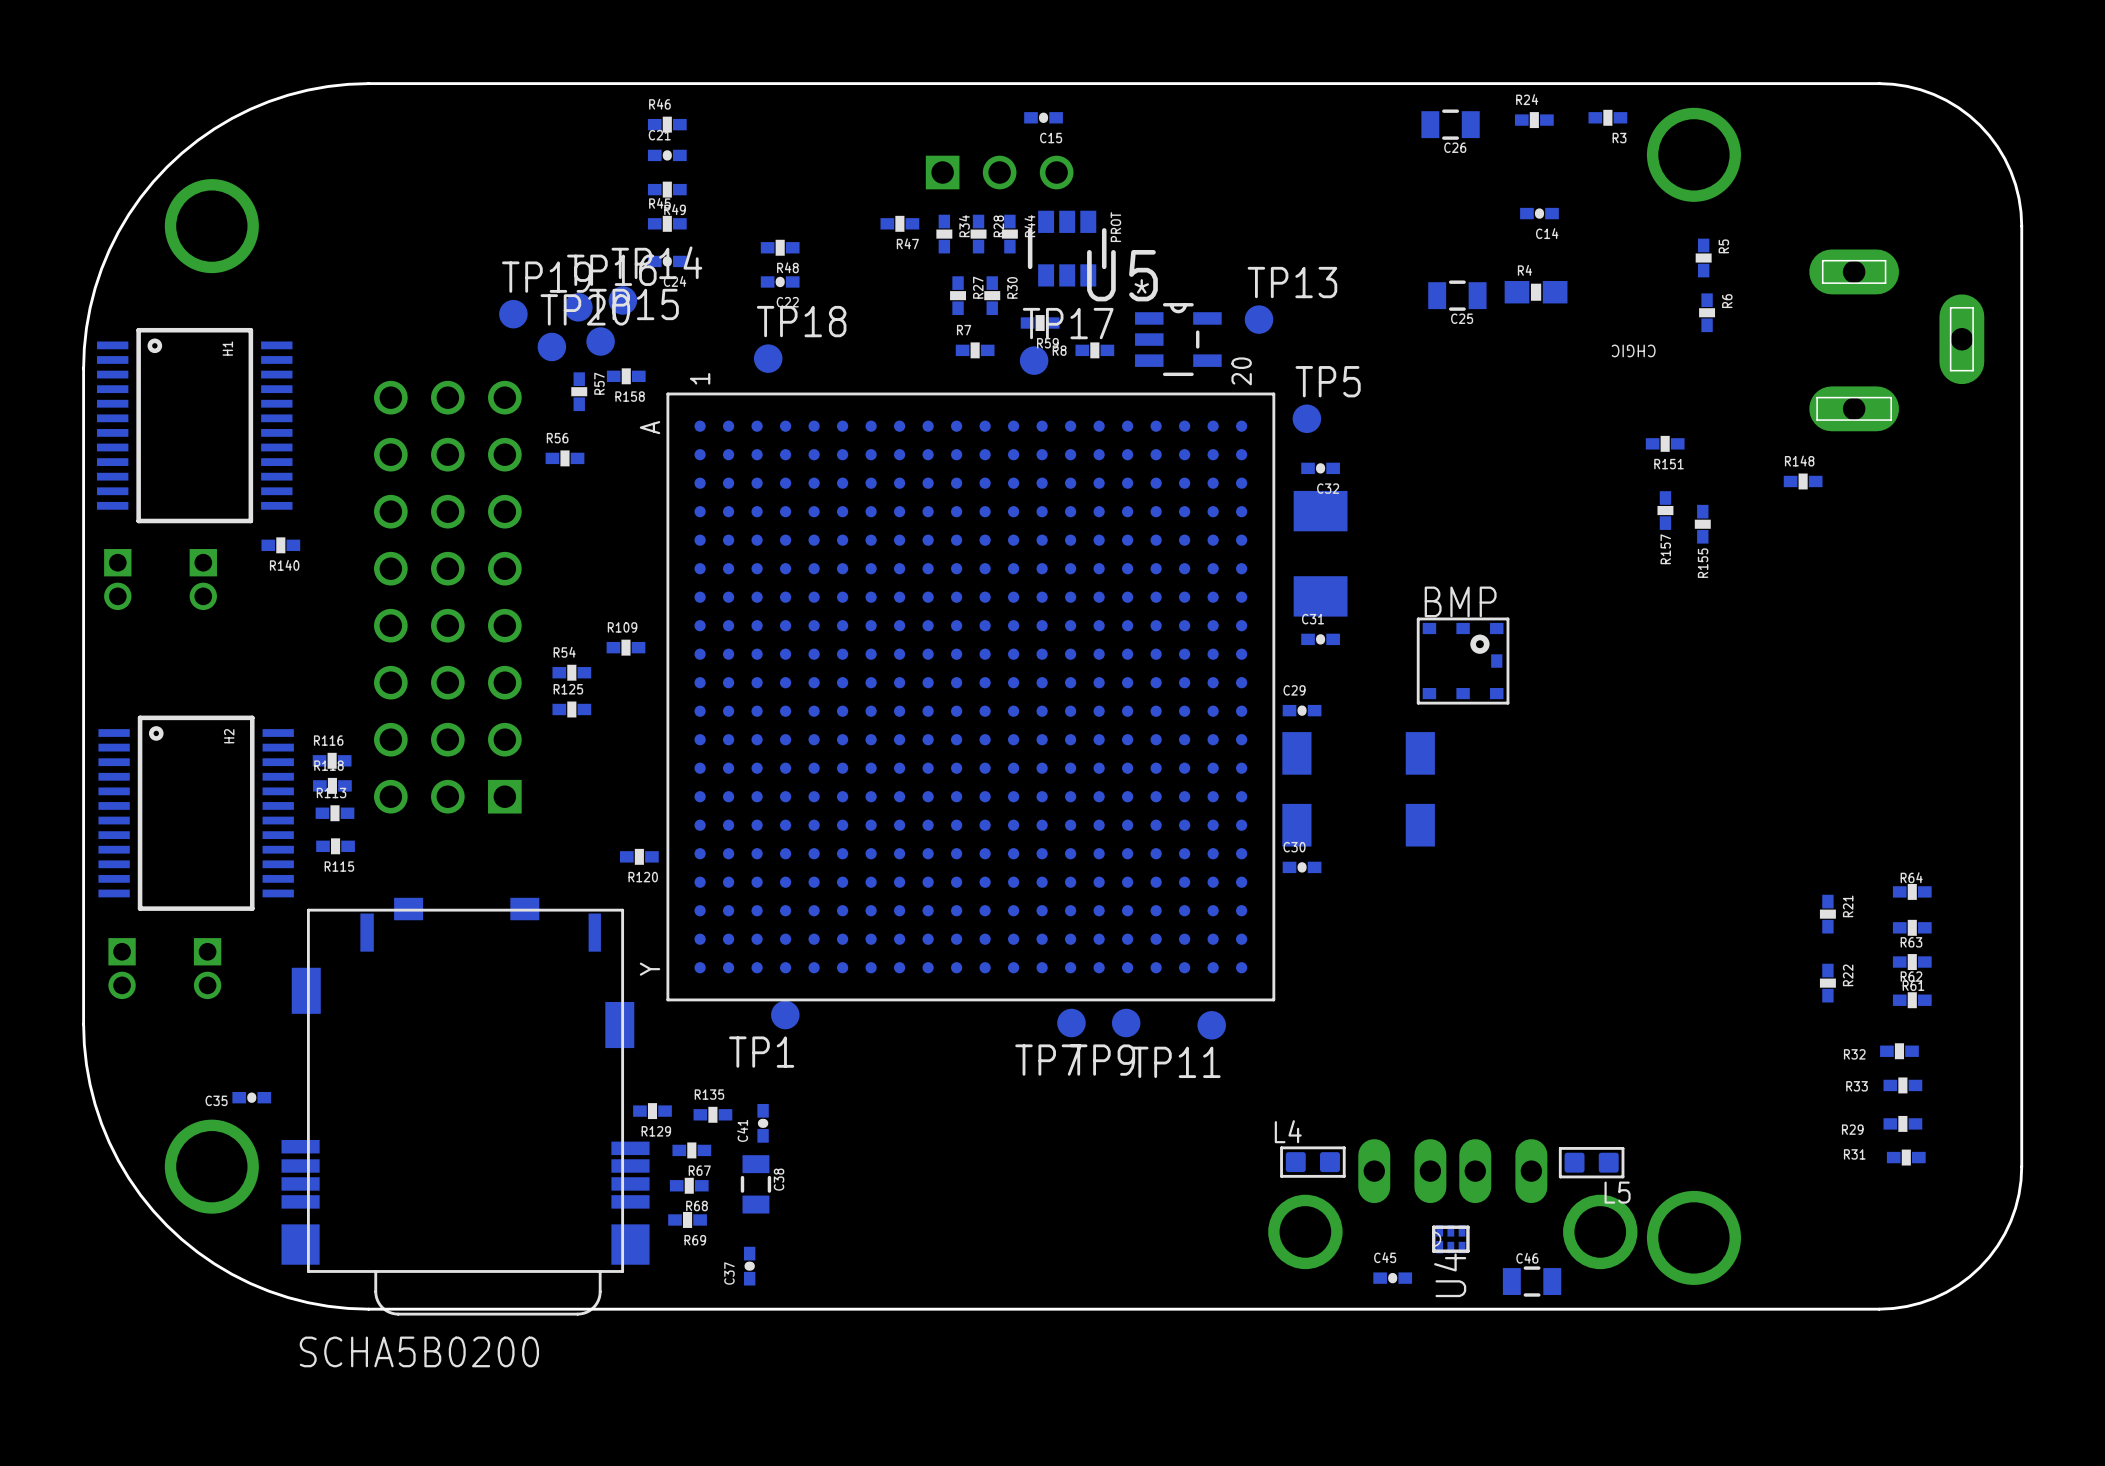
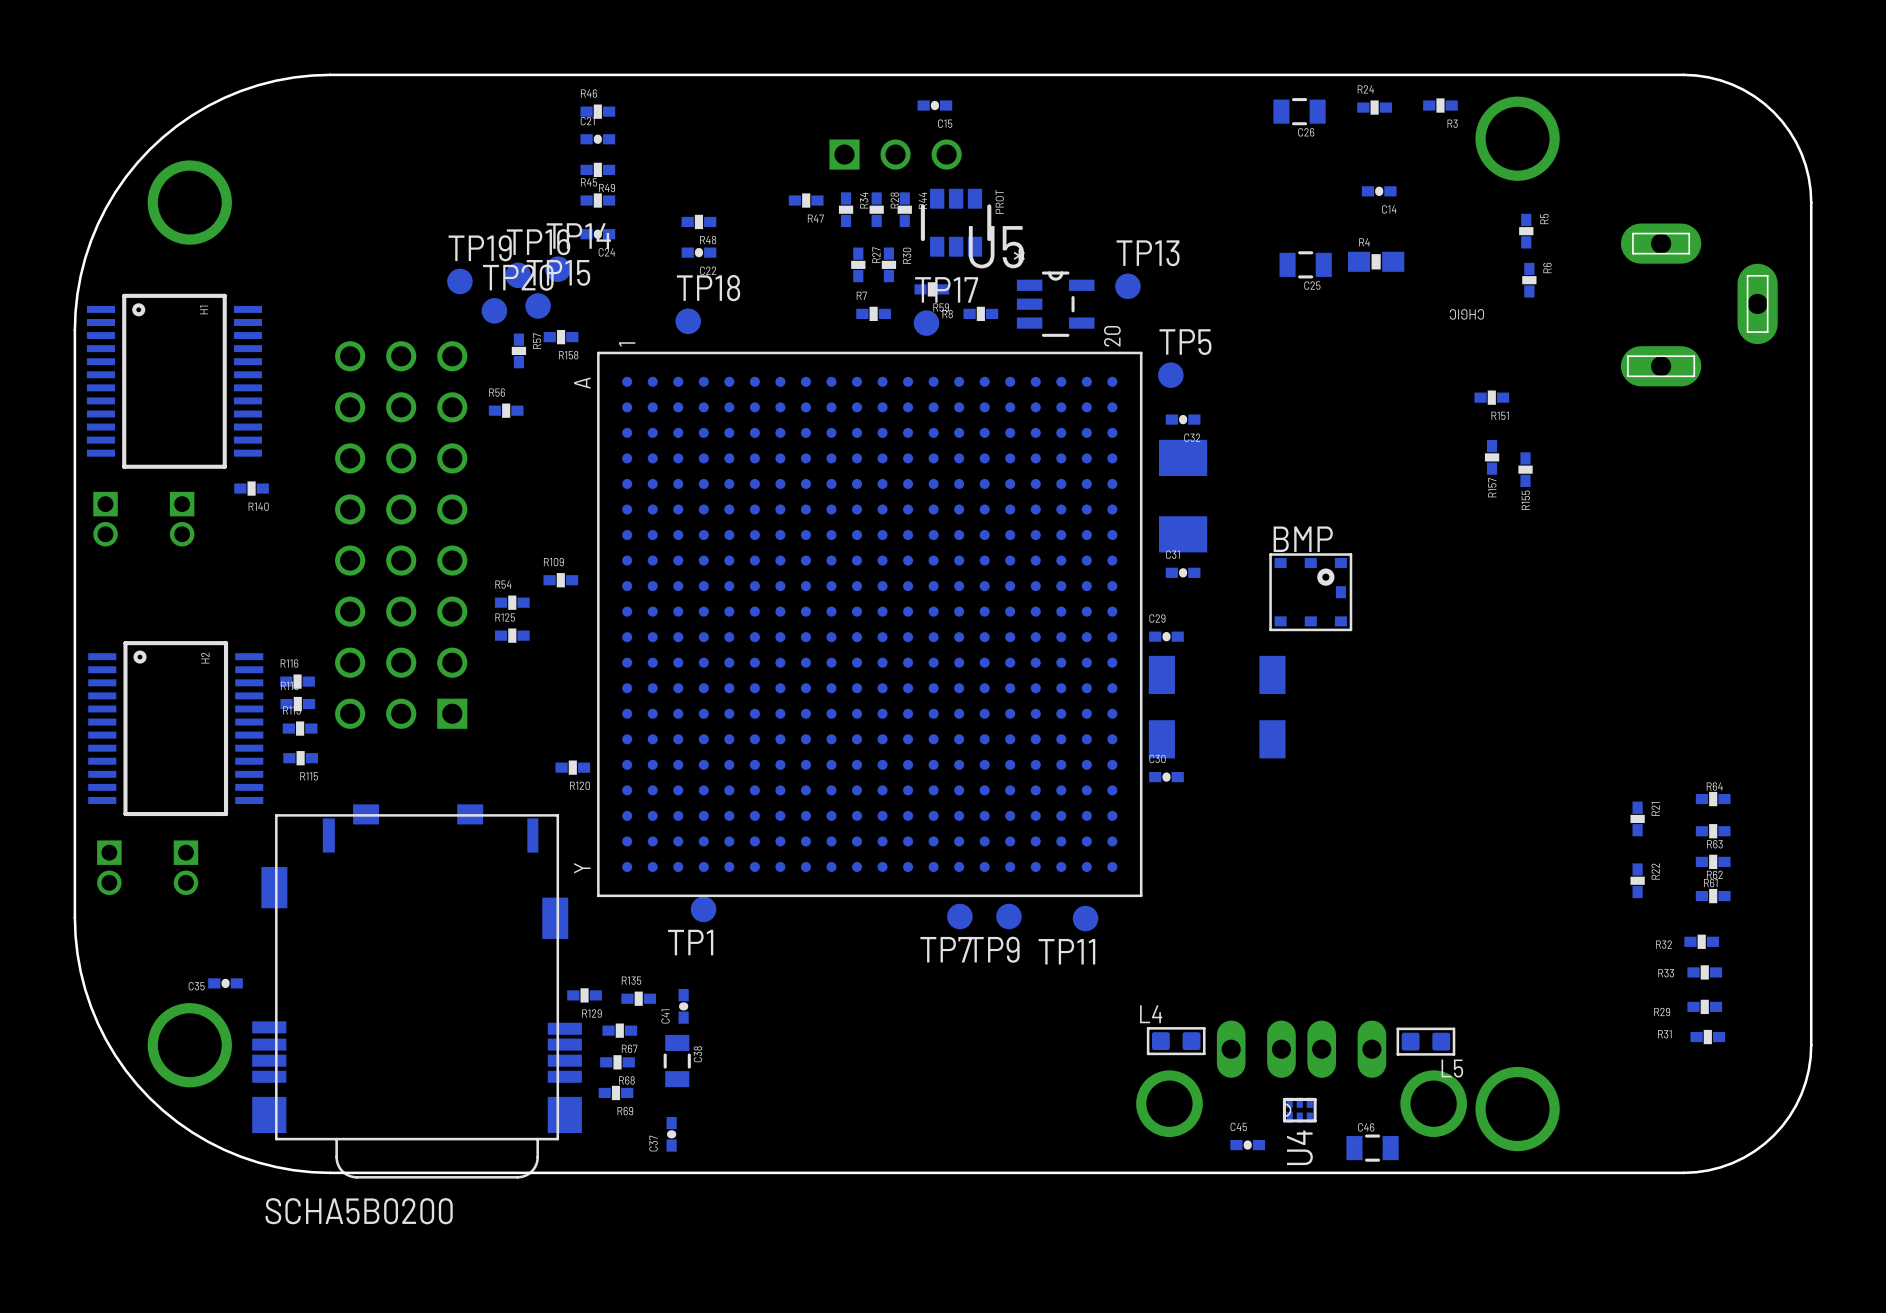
R148: (1803, 481) -> none

